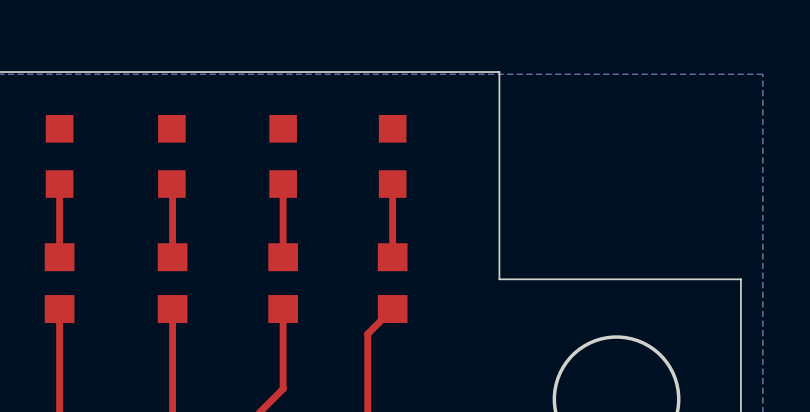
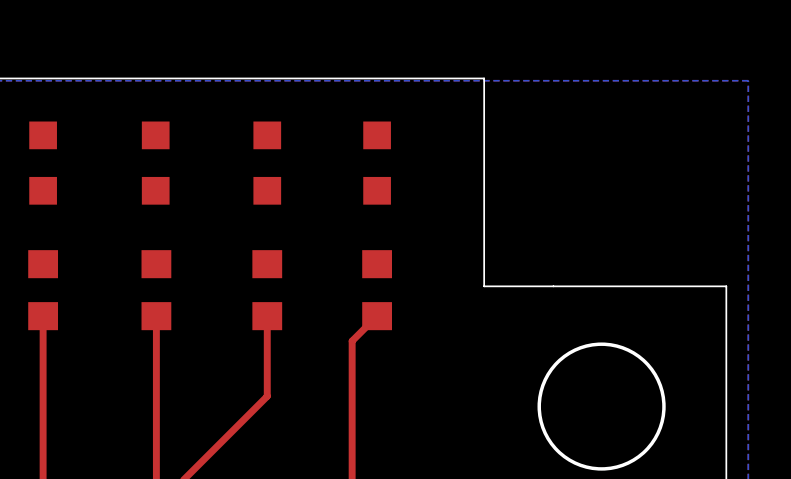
top track: (59, 184) (59, 257) -> none
top track: (171, 184) (172, 257) -> none
top track: (283, 184) (283, 257) -> none
top track: (392, 184) (392, 257) -> none

